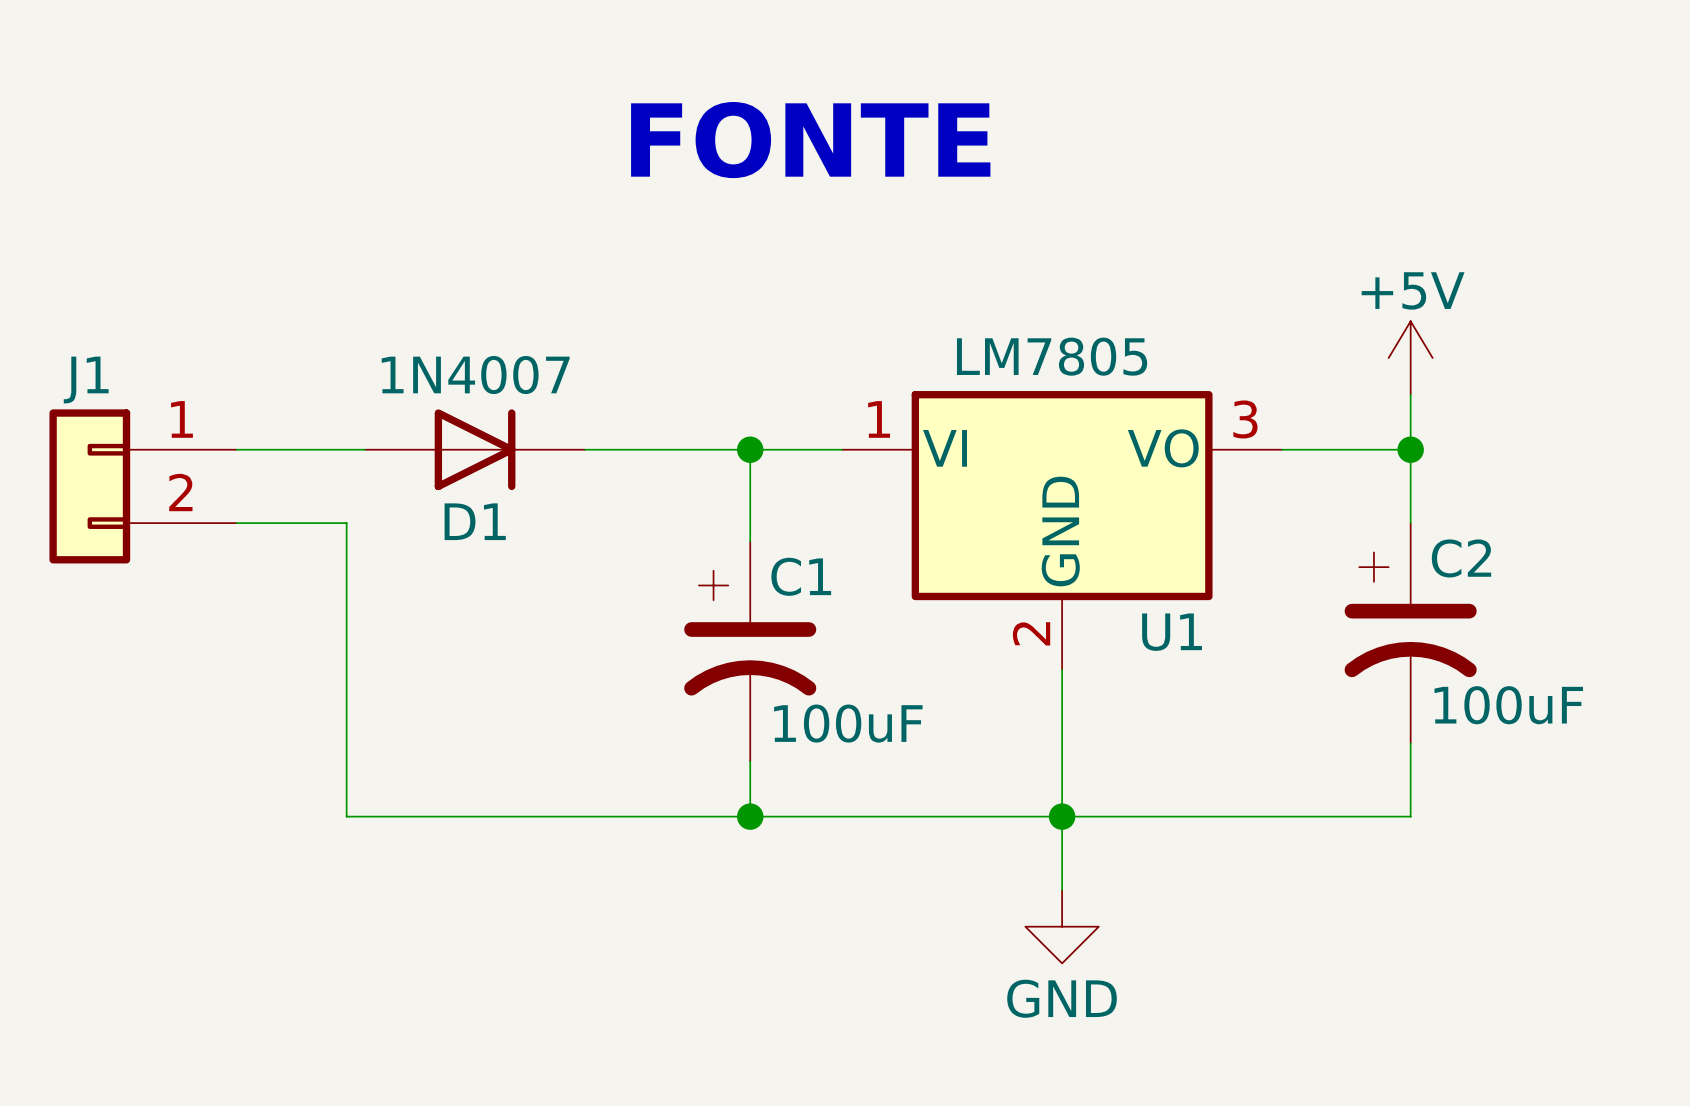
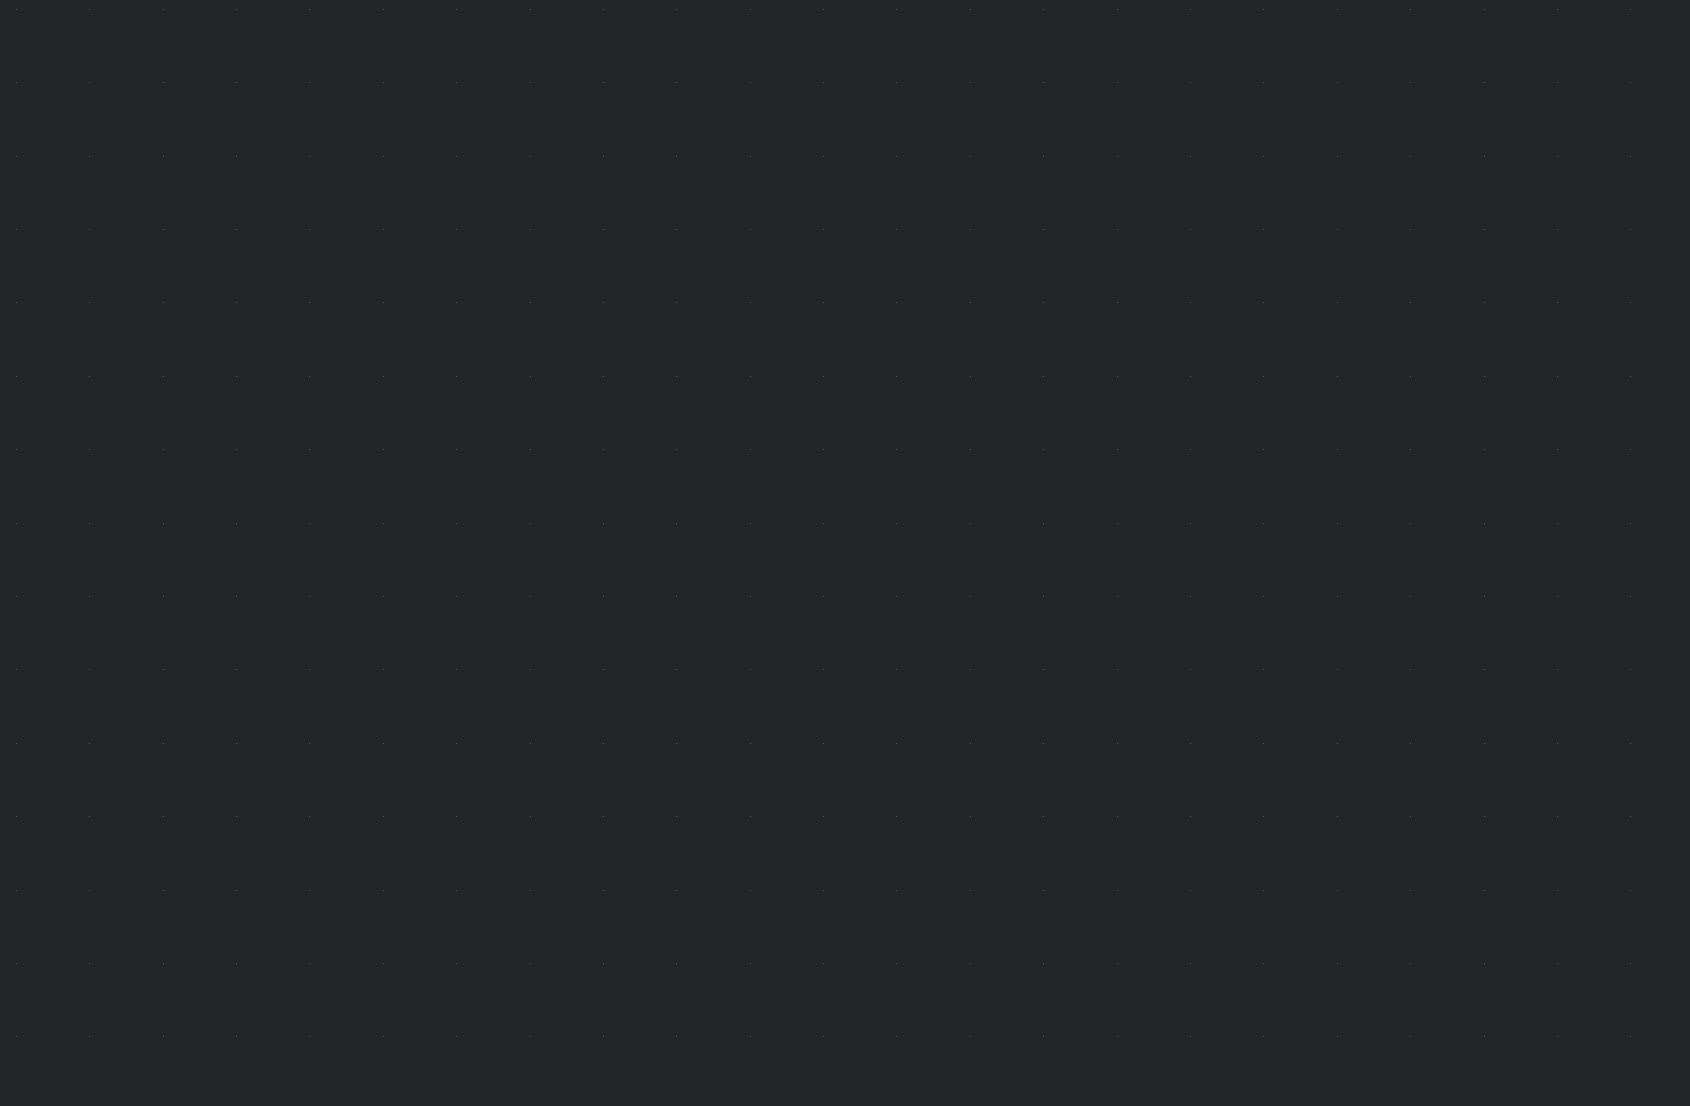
text: FONTE (810, 140) -> none
power symbol: +5V (1410, 358) -> none
wire: (1410, 394) (1410, 523) -> none
wire: (236, 449) (364, 449) -> none
D1: 1N4007 (475, 449) -> none
wire: (585, 449) (841, 449) -> none
wire: (750, 449) (750, 541) -> none
junction: (750, 449) -> none
wire: (1282, 449) (1410, 449) -> none
junction: (1410, 449) -> none
J1: (143, 486) -> none
wire: (236, 523) (346, 523) (346, 816) (1410, 816) (1410, 743) -> none
U1: LM7805 (1062, 530) -> none
C2: 100uF (1410, 633) -> none
C1: 100uF (750, 651) -> none
wire: (1062, 669) (1062, 890) -> none
wire: (750, 761) (750, 816) -> none
junction: (750, 816) -> none
junction: (1062, 816) -> none
power symbol: GND (1062, 926) -> none

